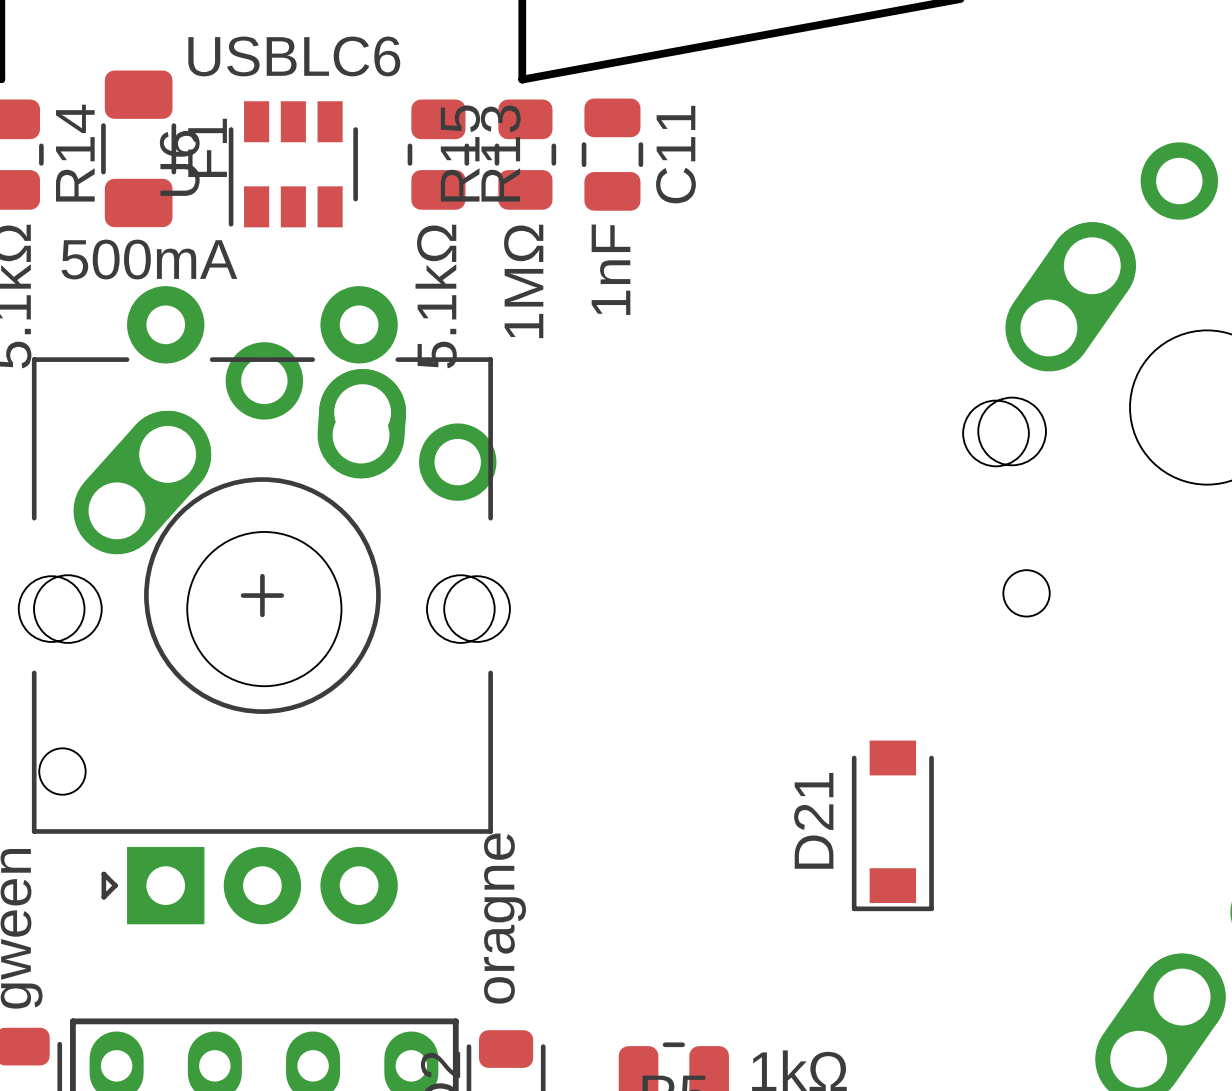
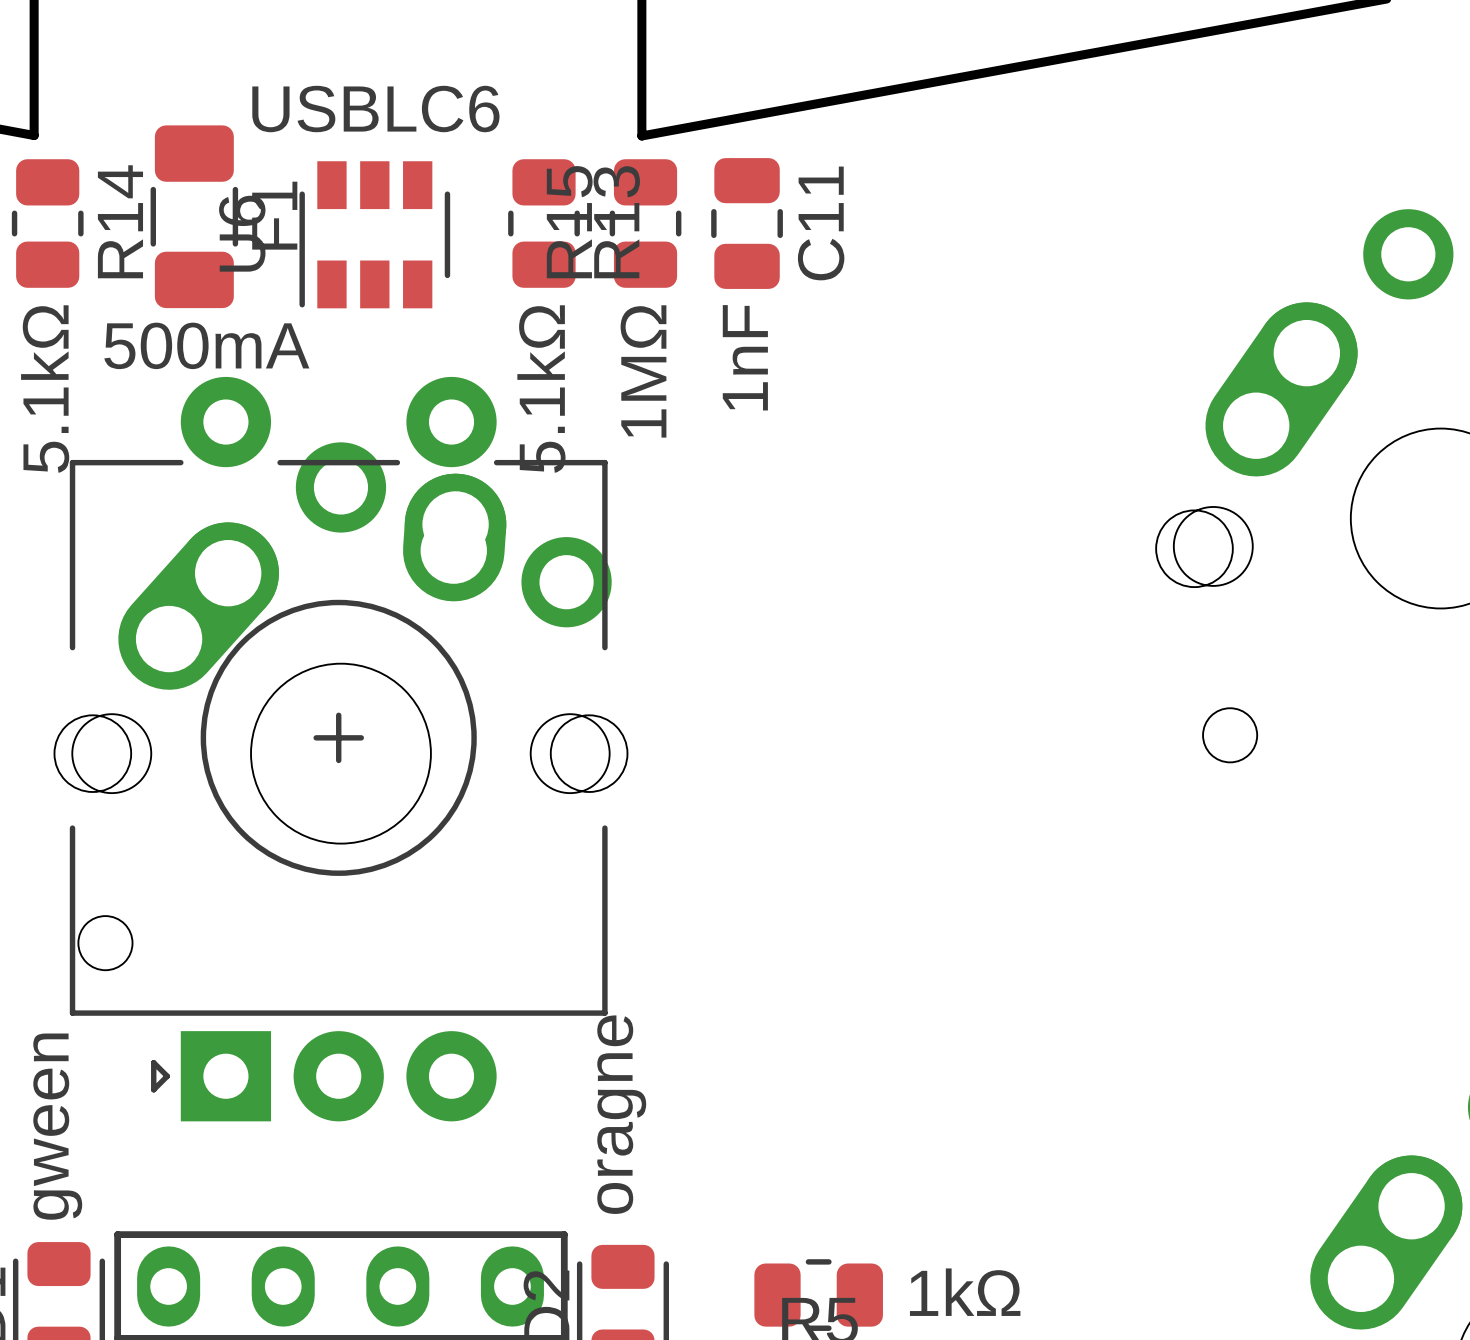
D21: (892, 825) -> none

